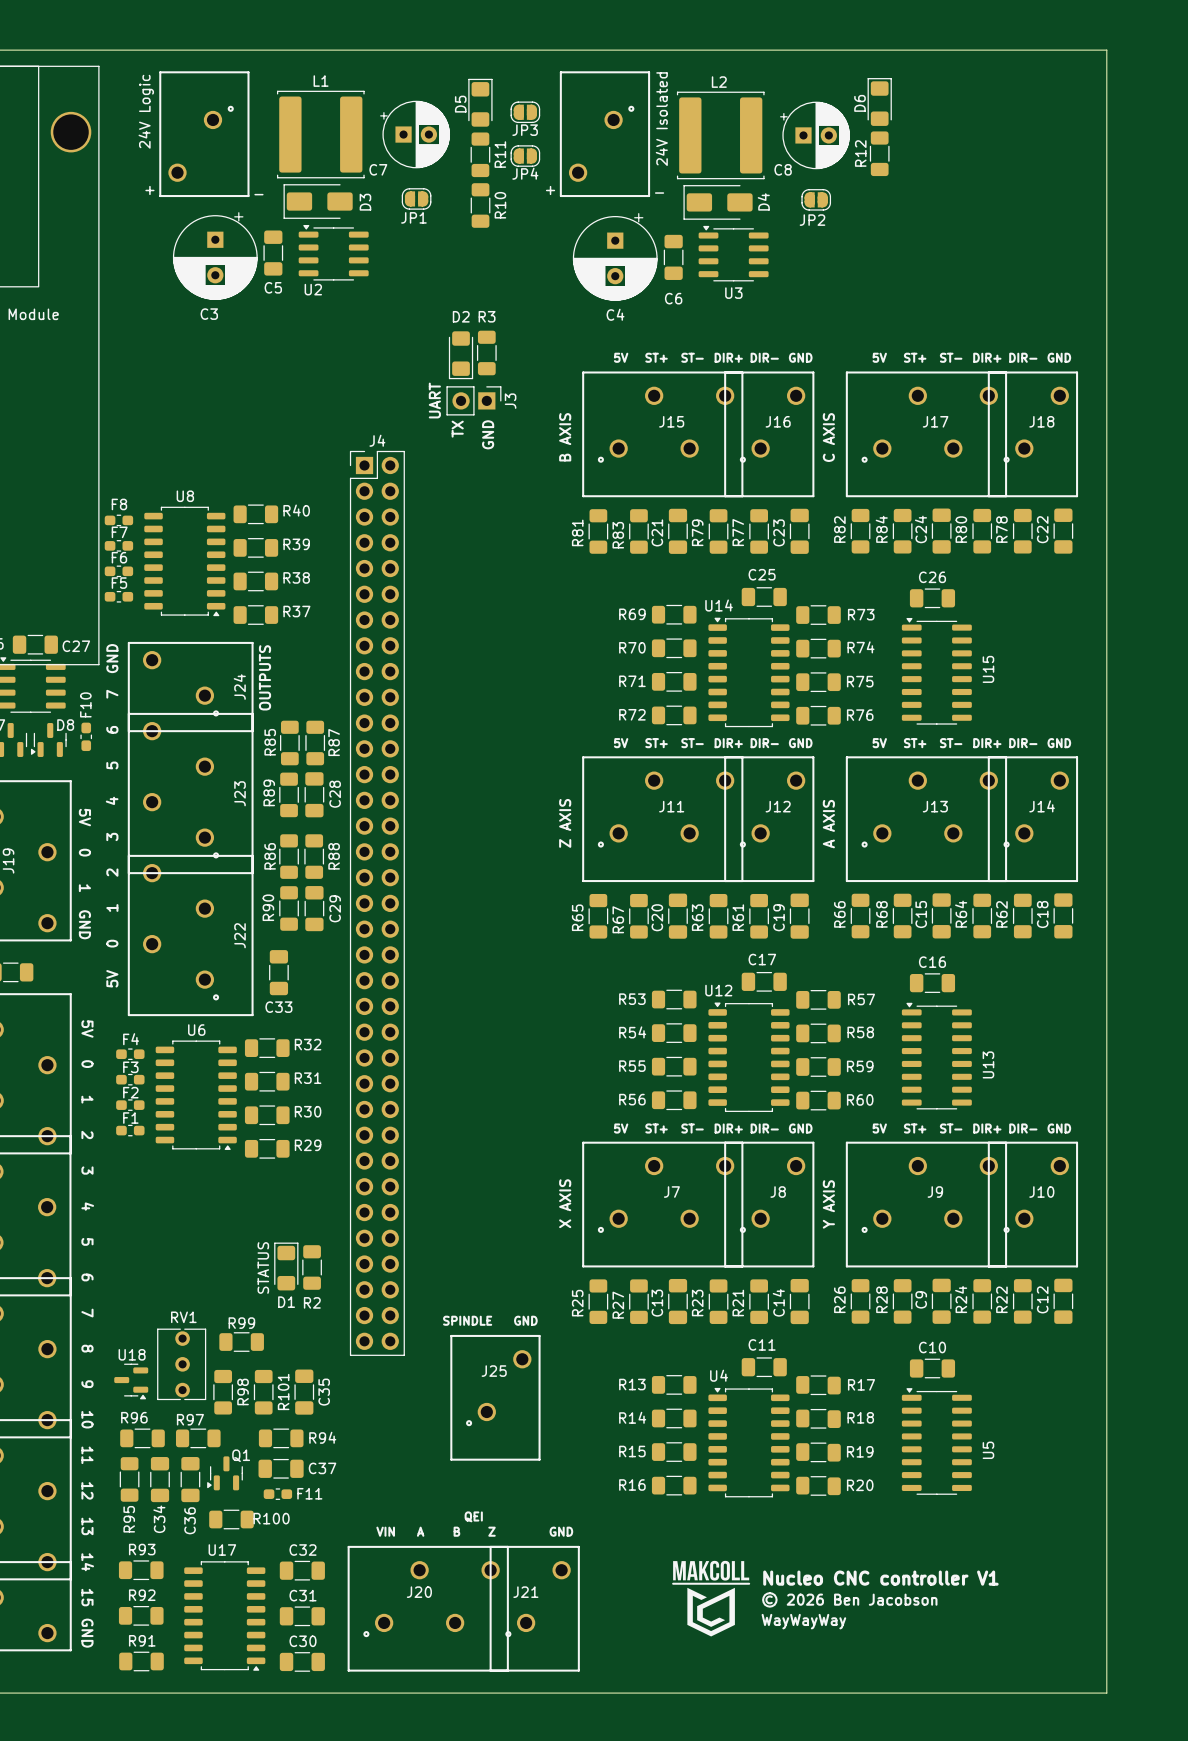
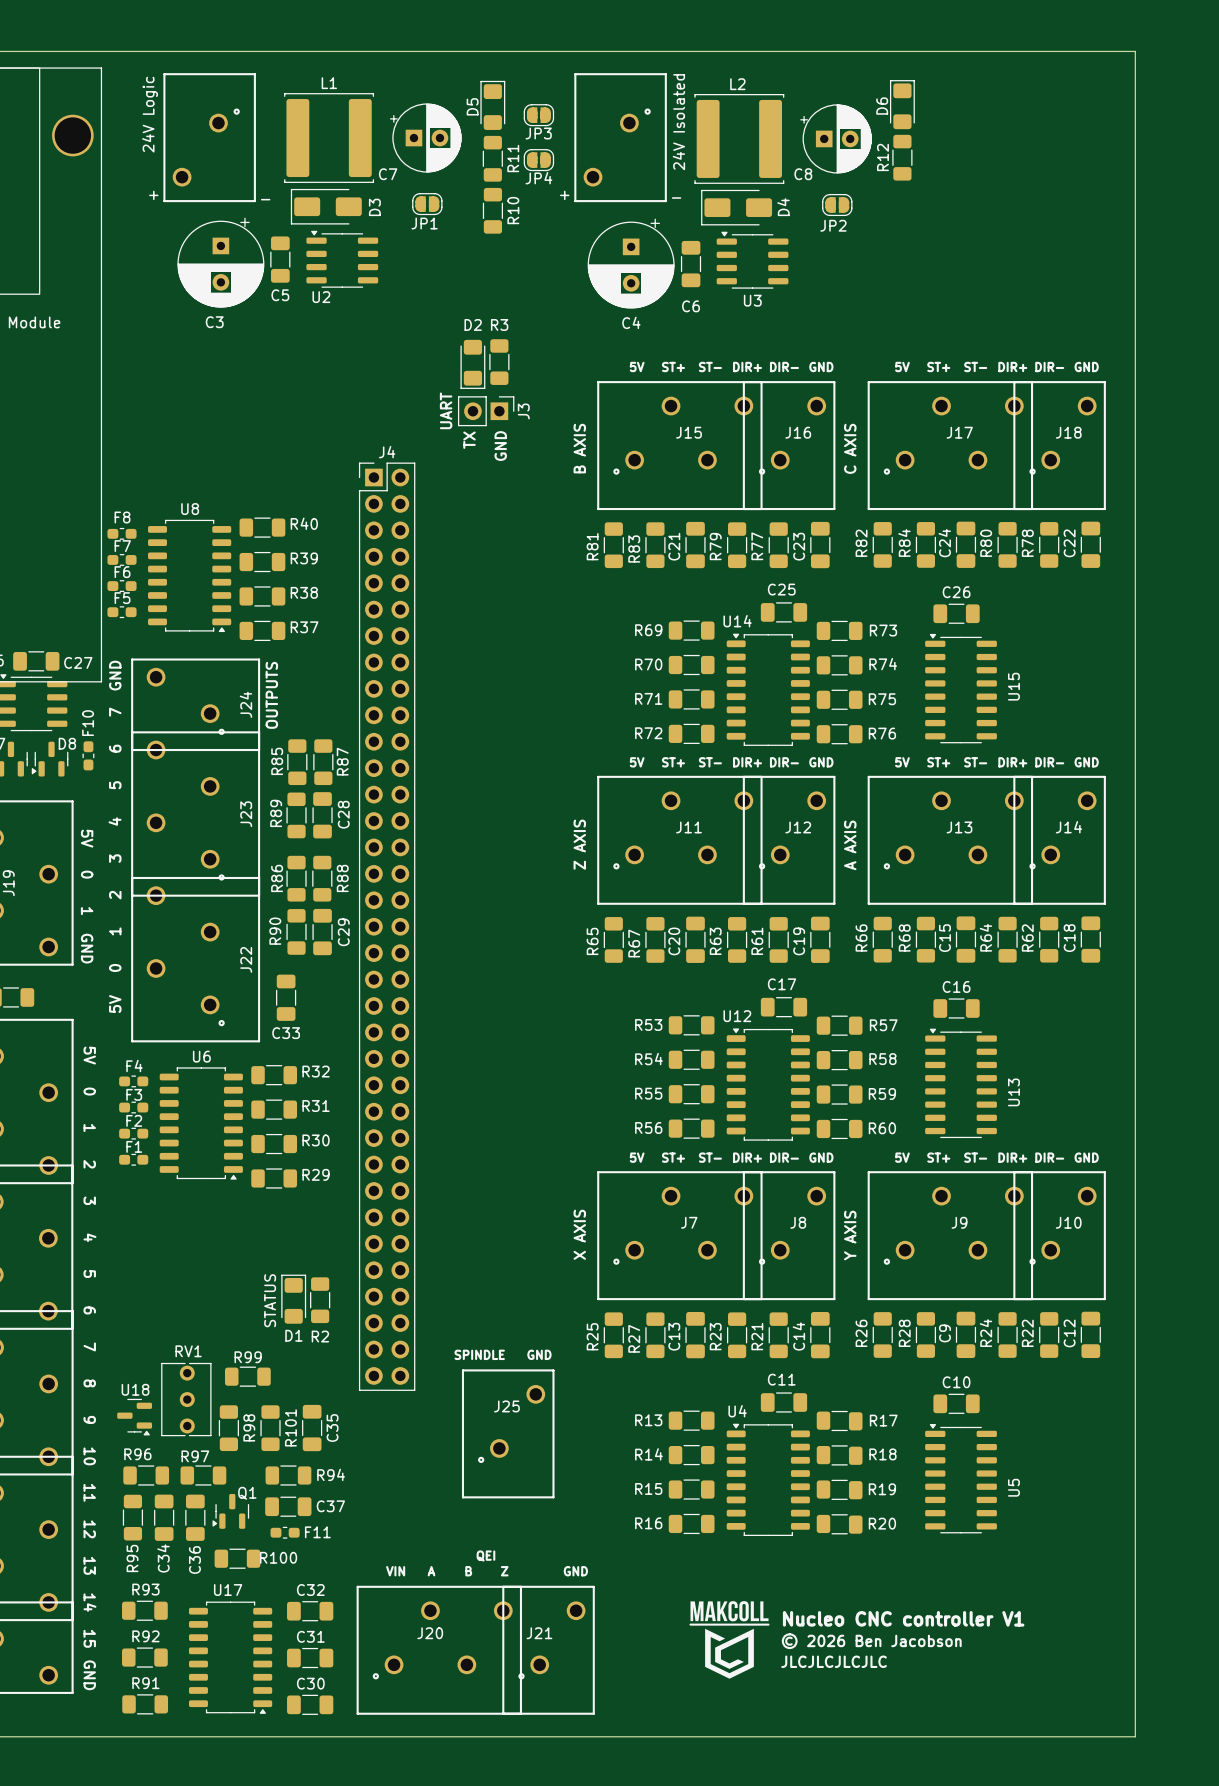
text: WayWayWay (803, 1621) -> JLCJLCJLCJLC (834, 1661)

